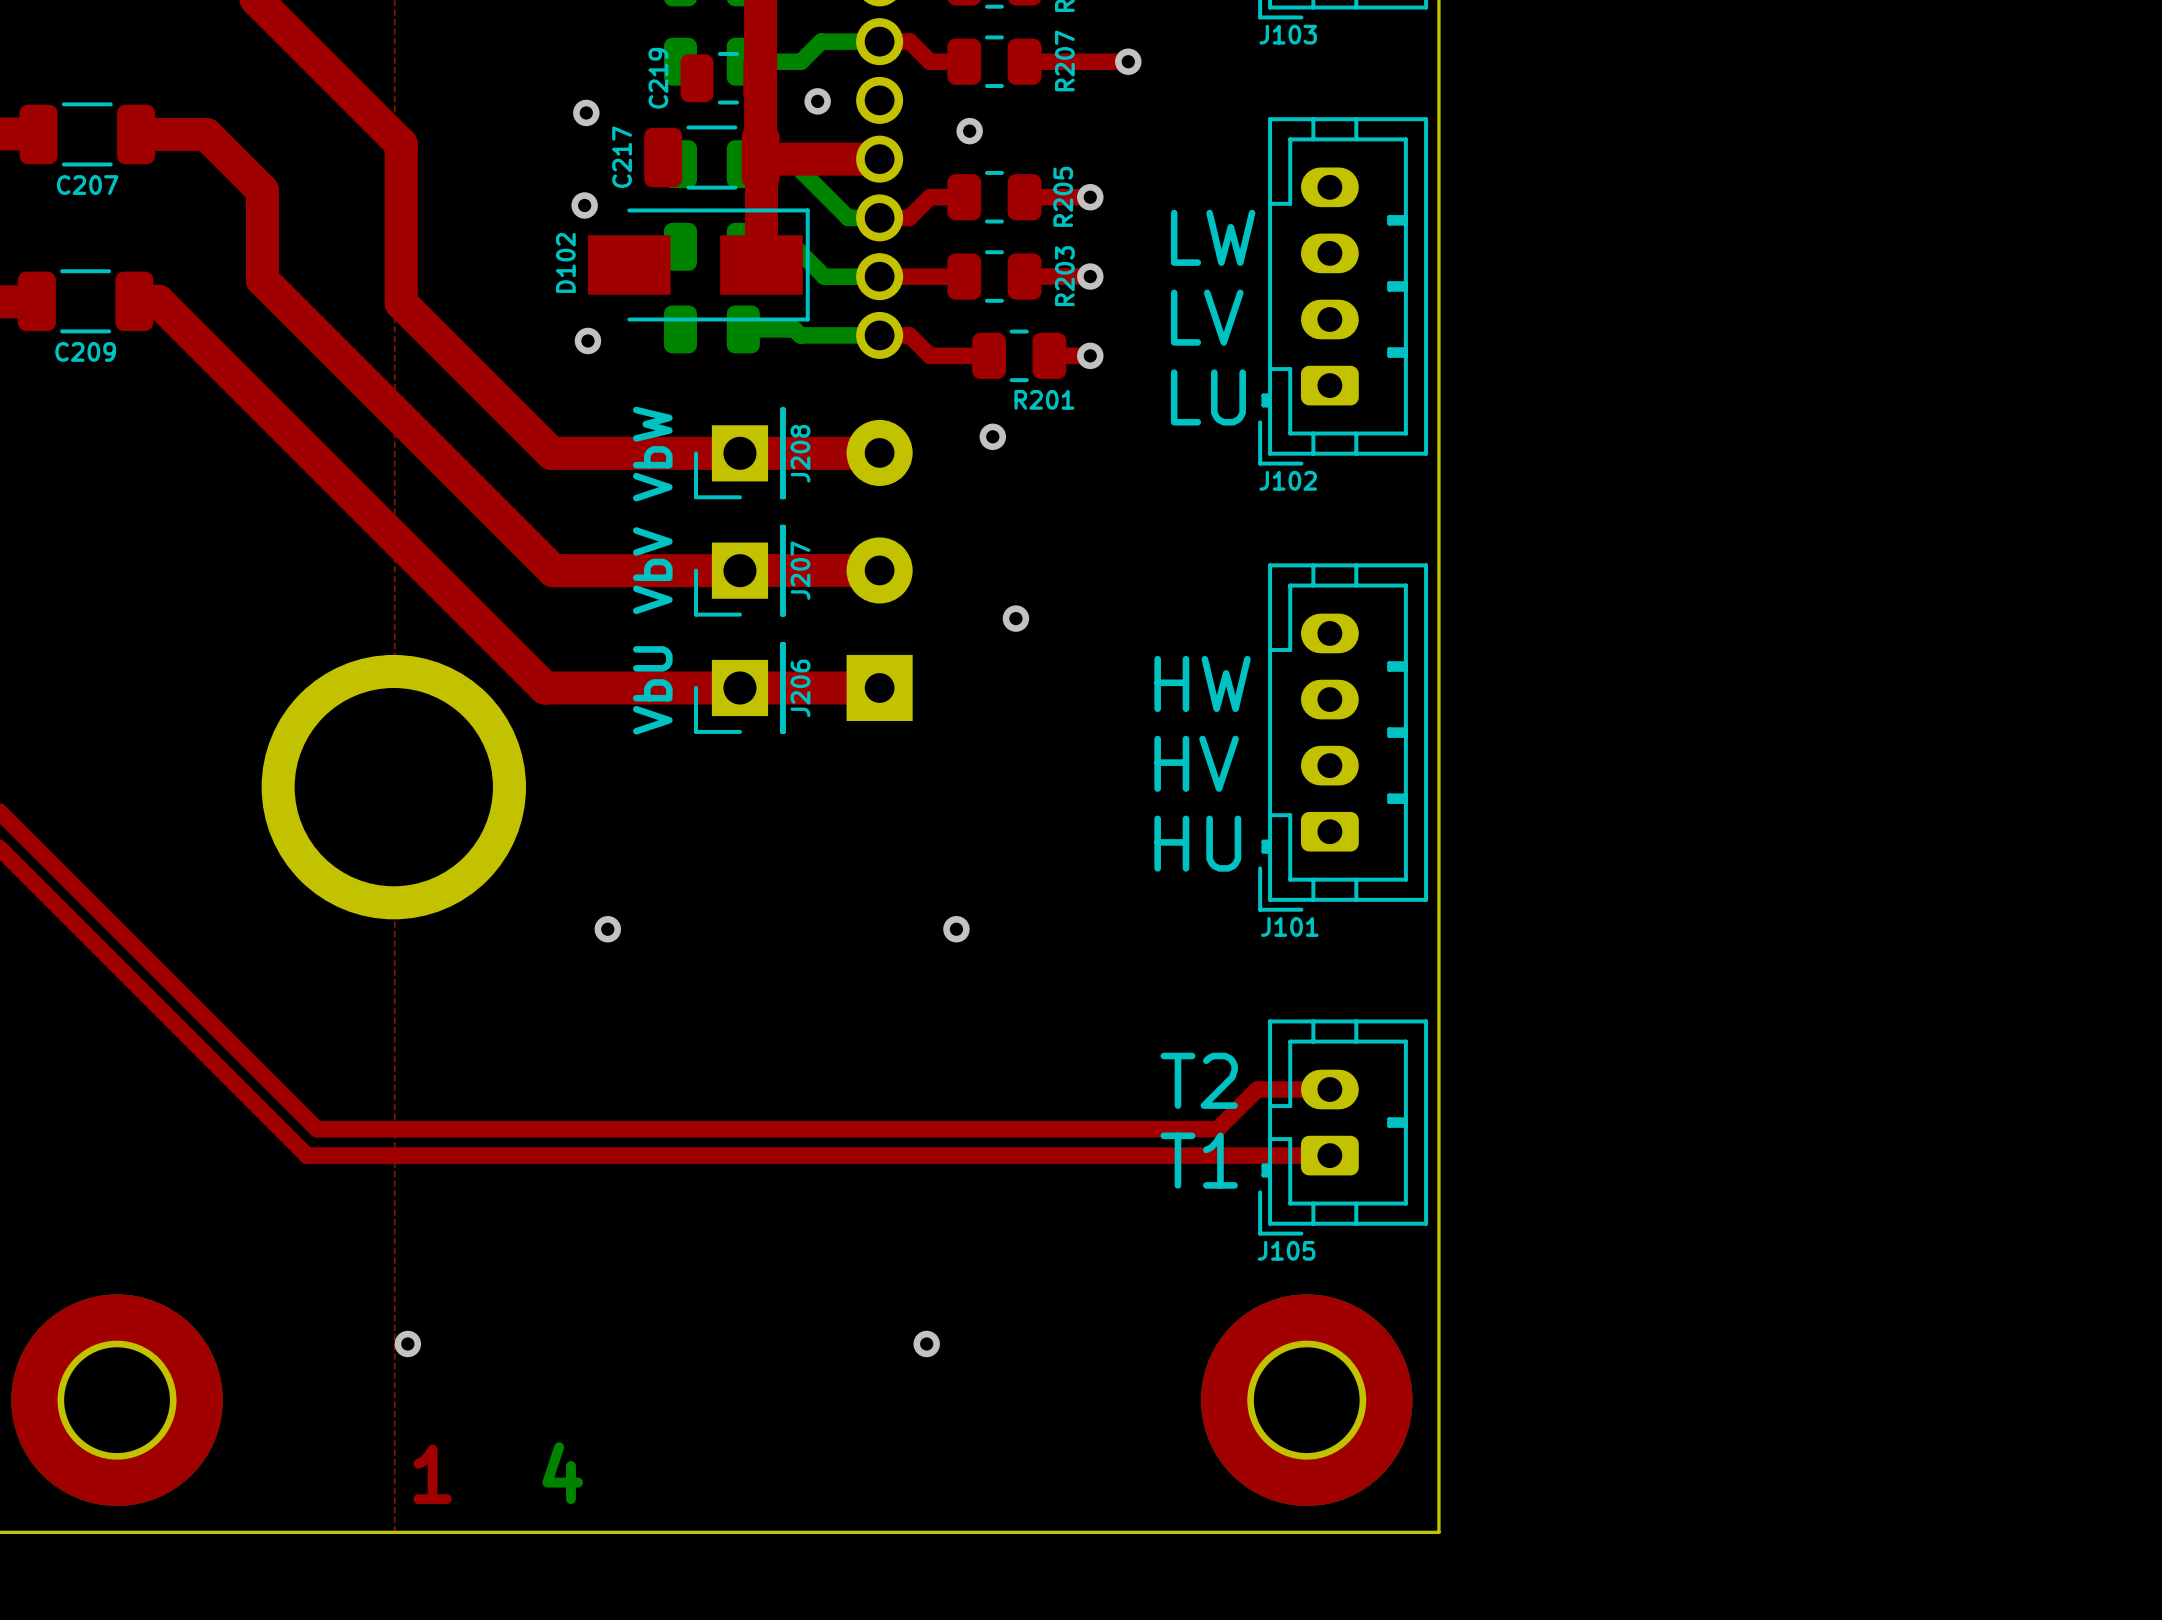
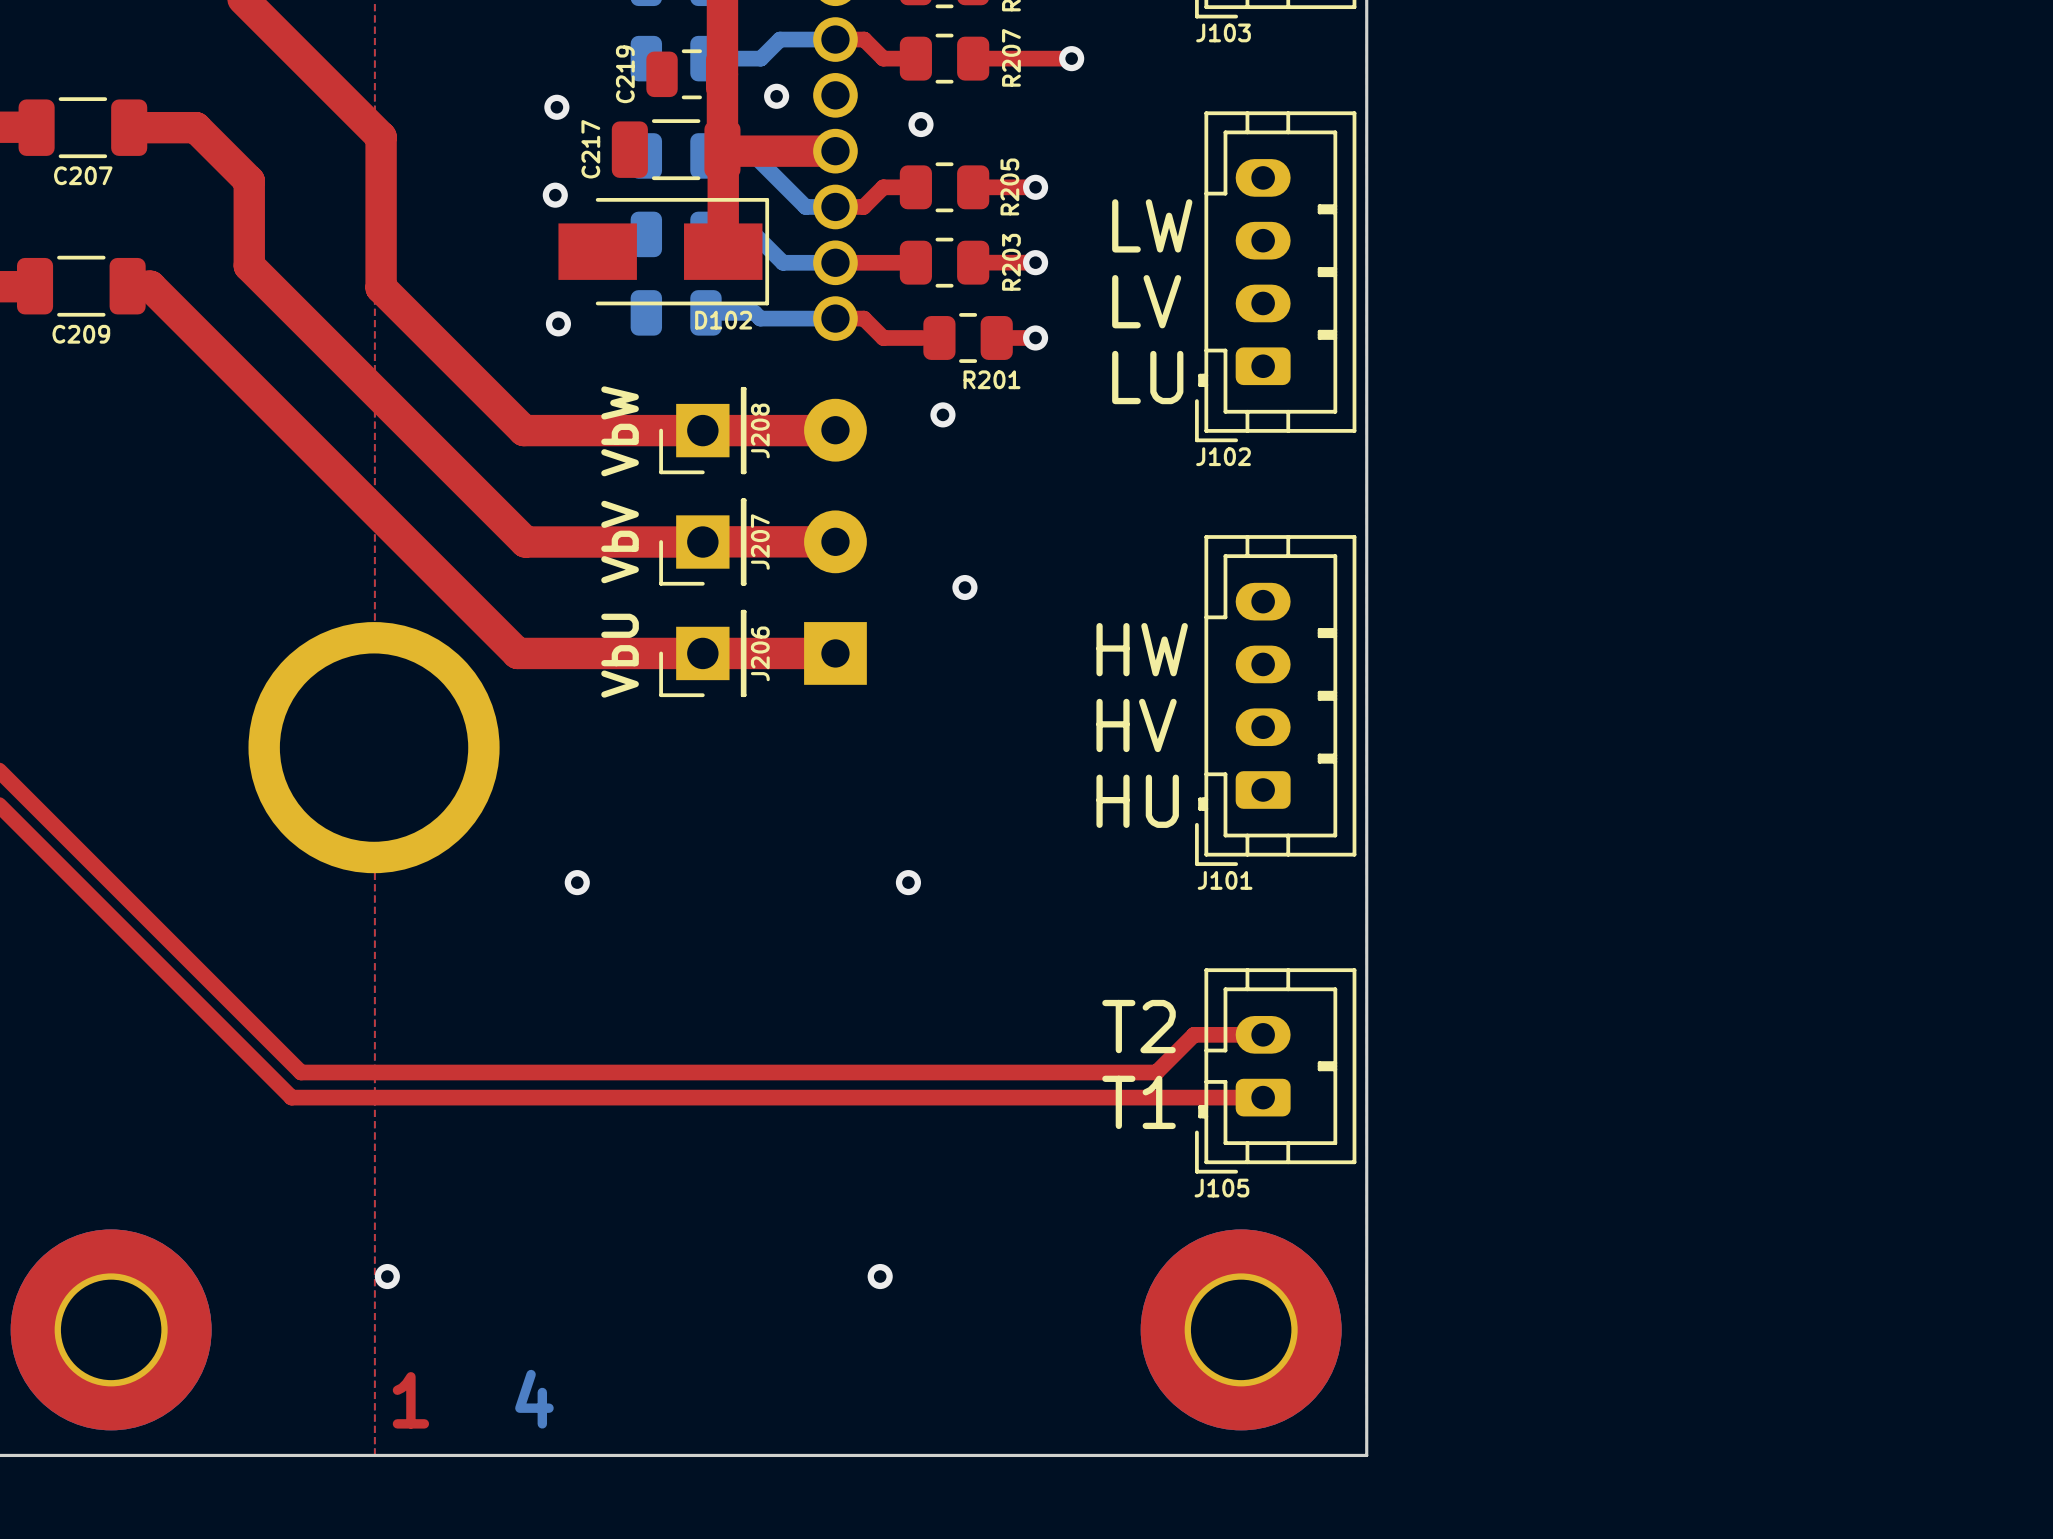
D102 name rotation: 0° (565, 262) -> 90° clockwise (723, 320)
D102 name position: D102 (565, 262) -> D102 (723, 320)

